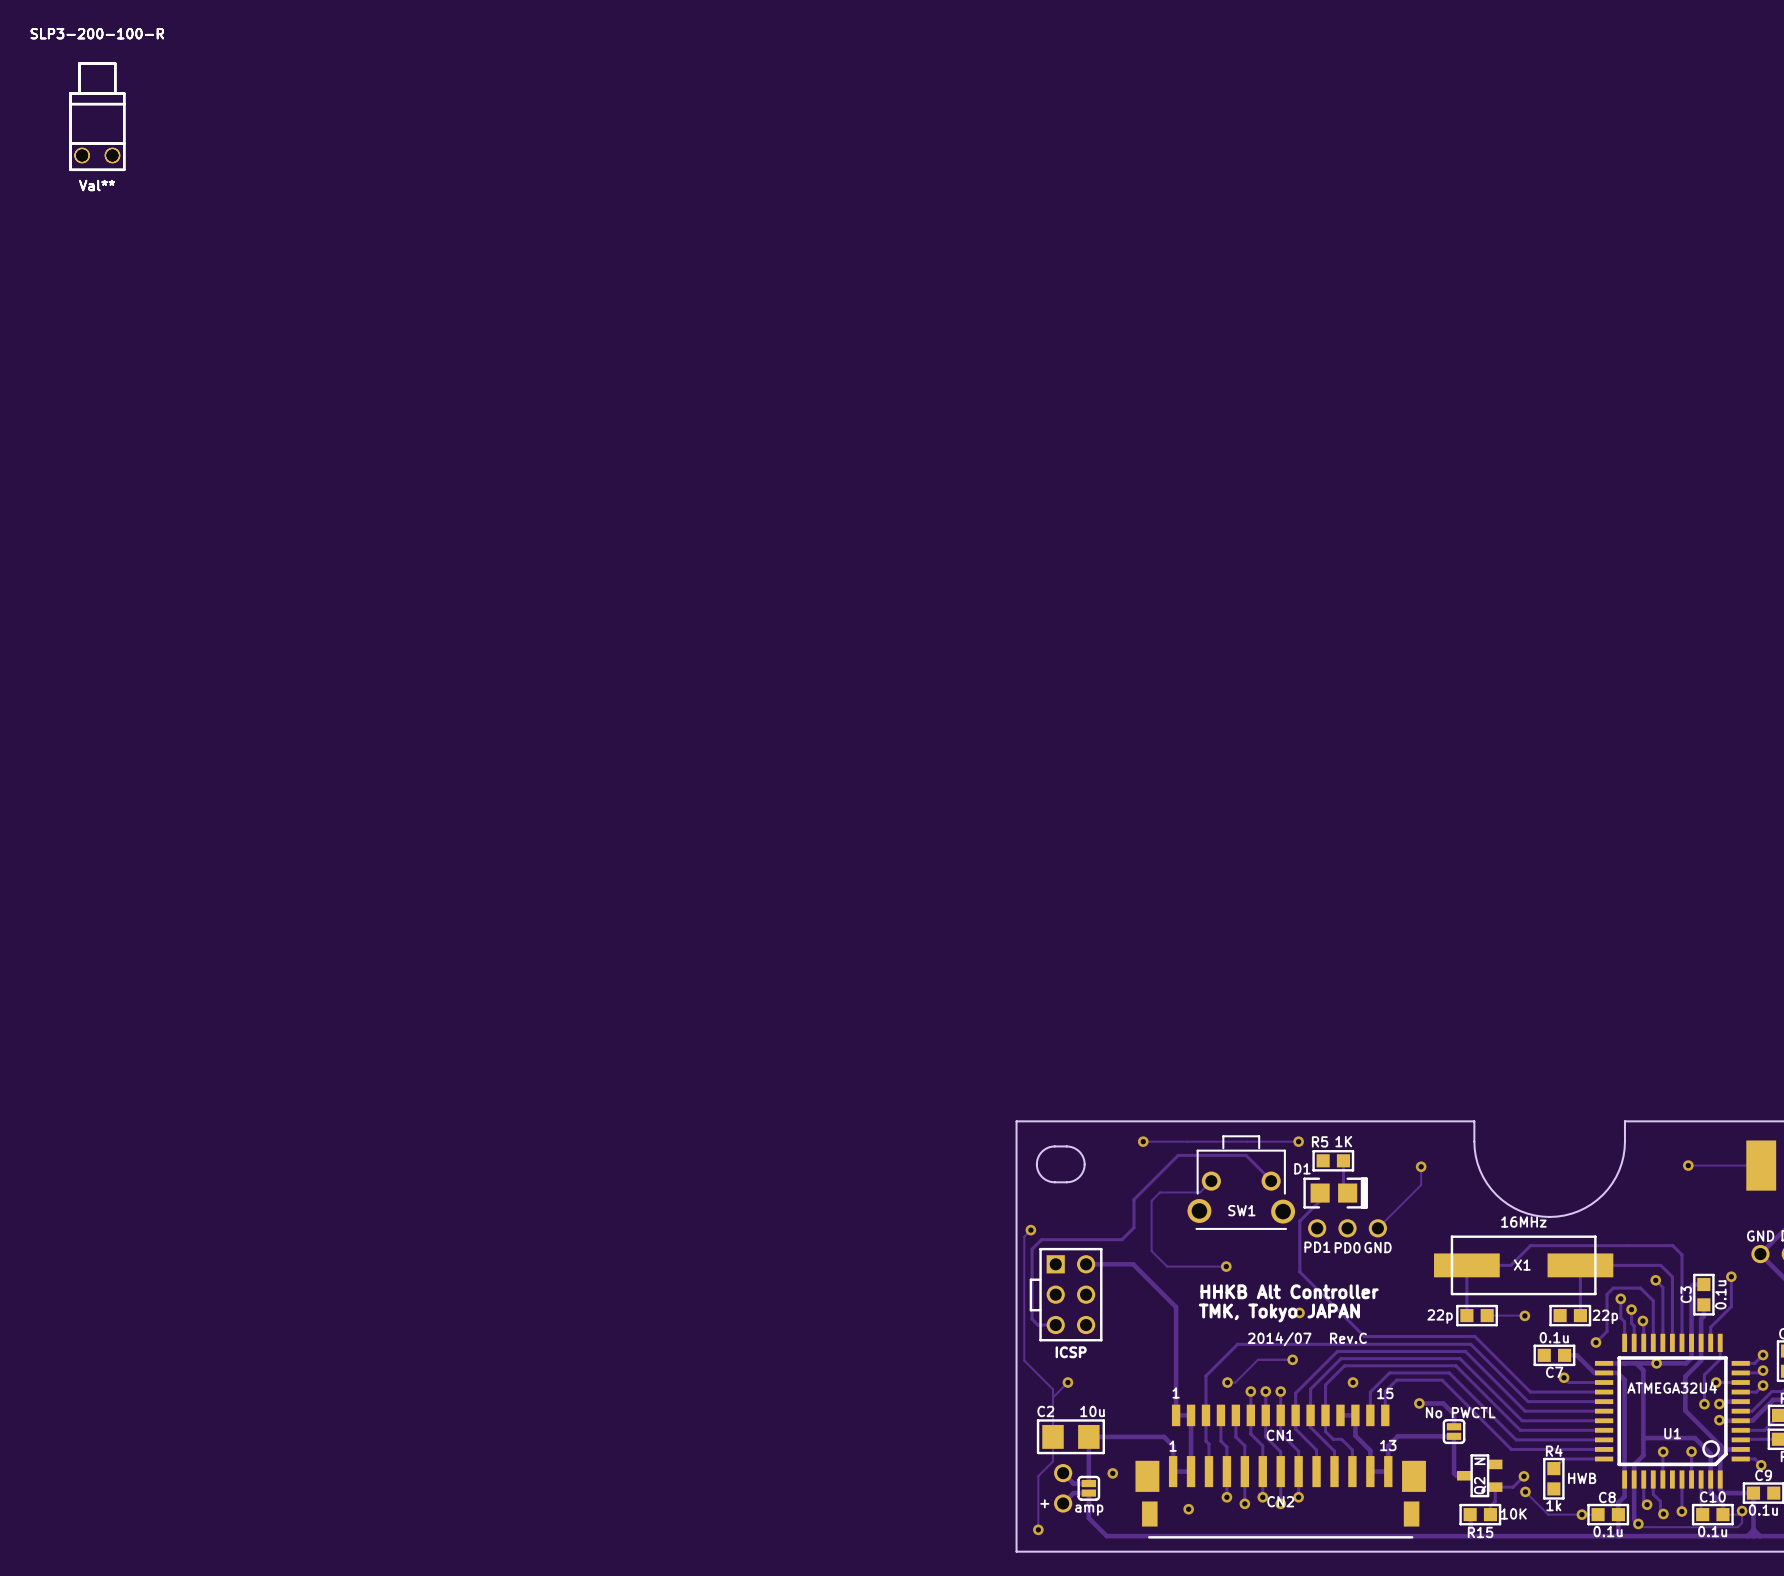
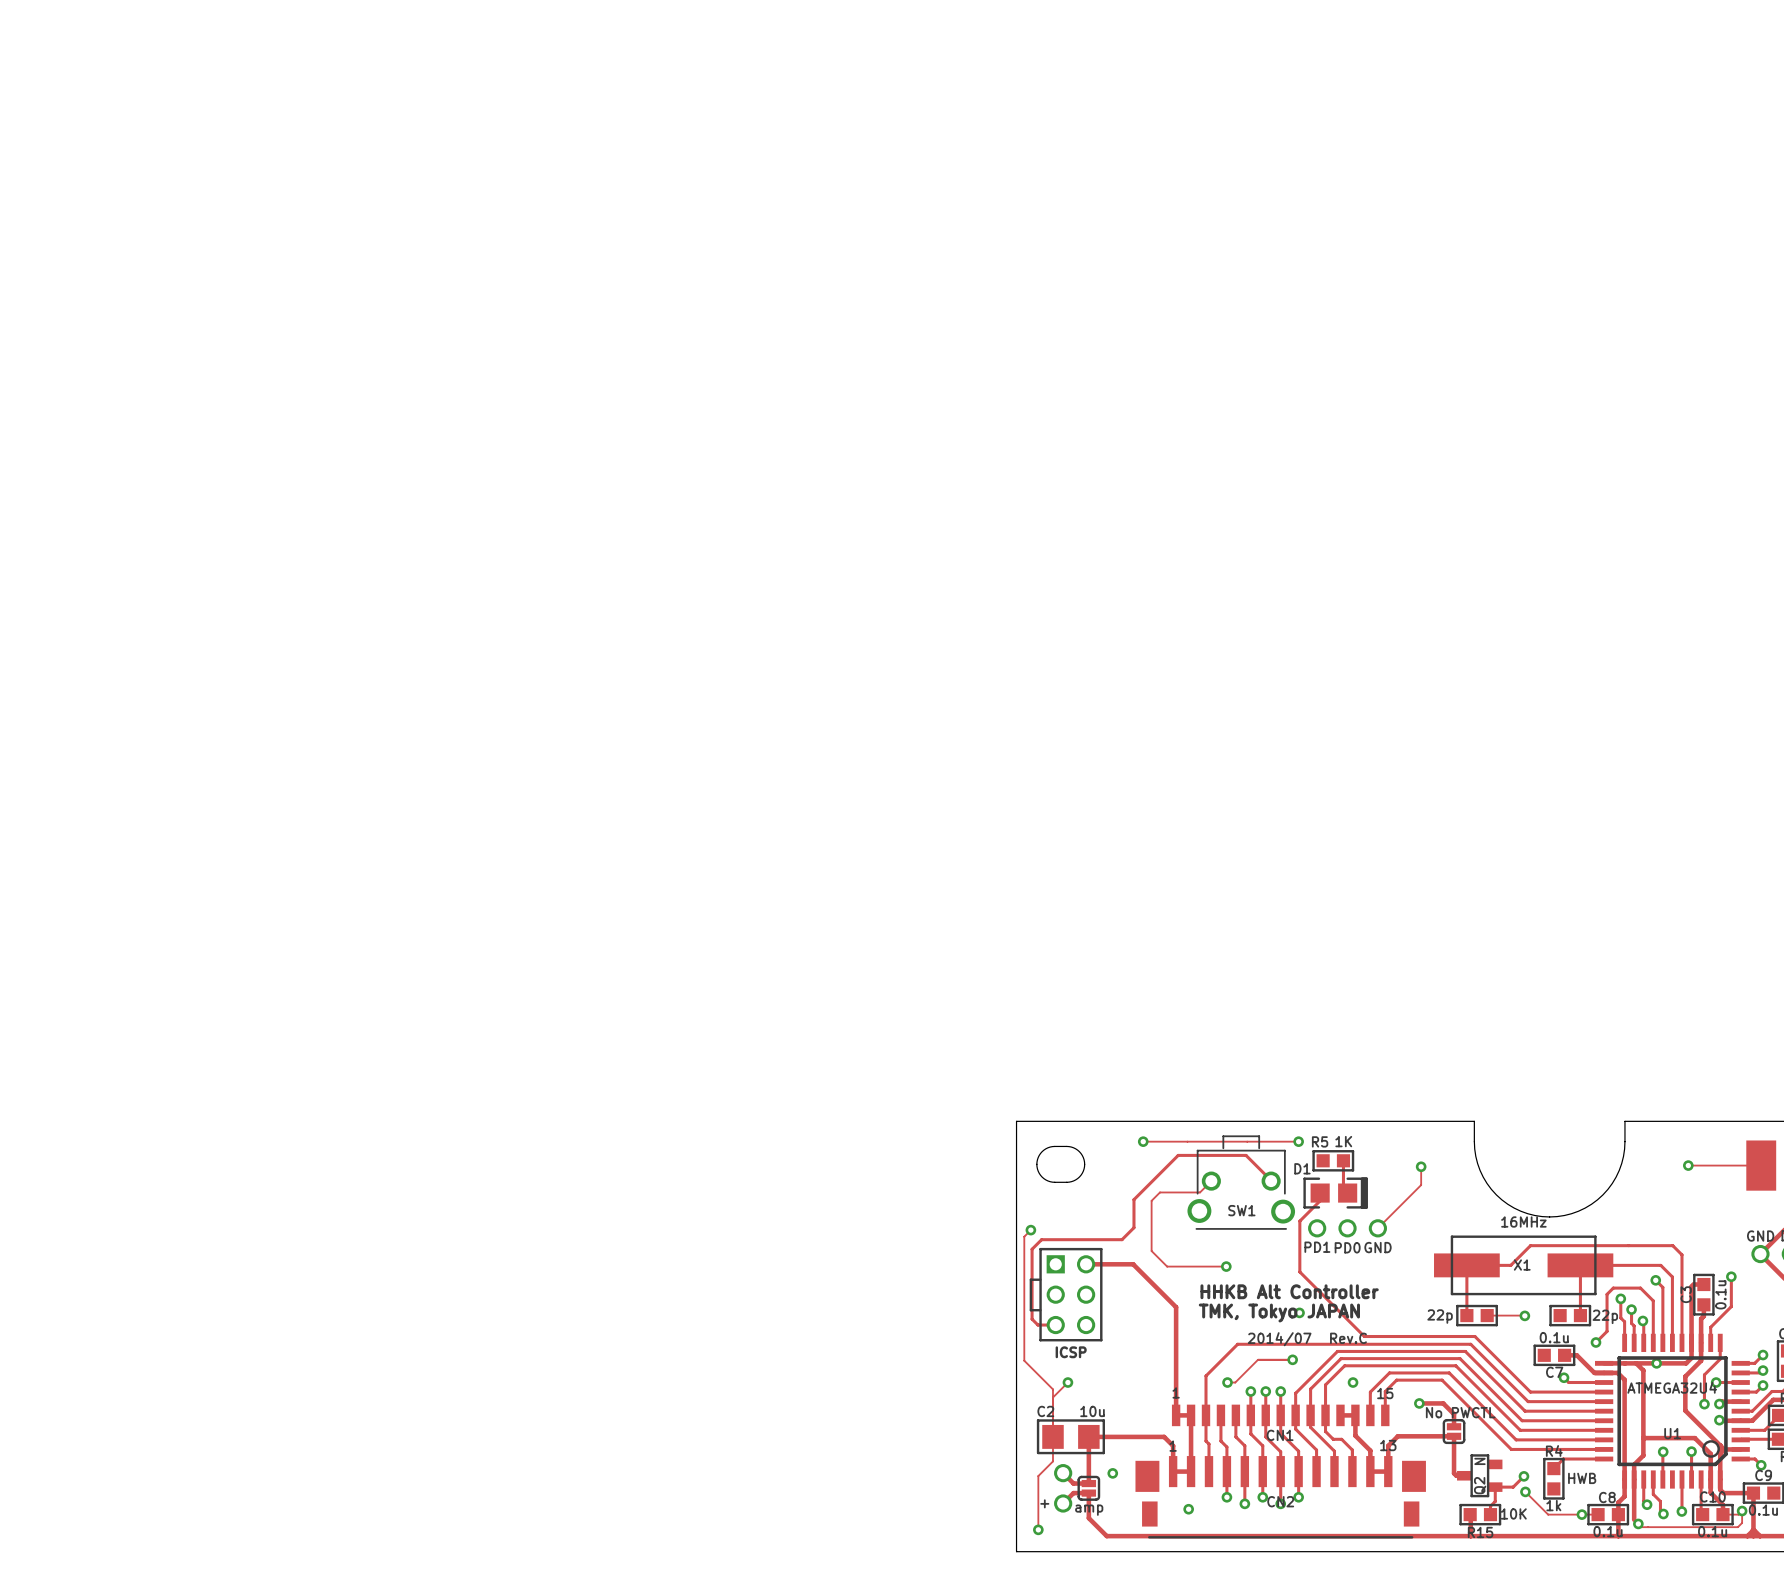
SLP3-200-100-R: Val** (97, 116) -> none

